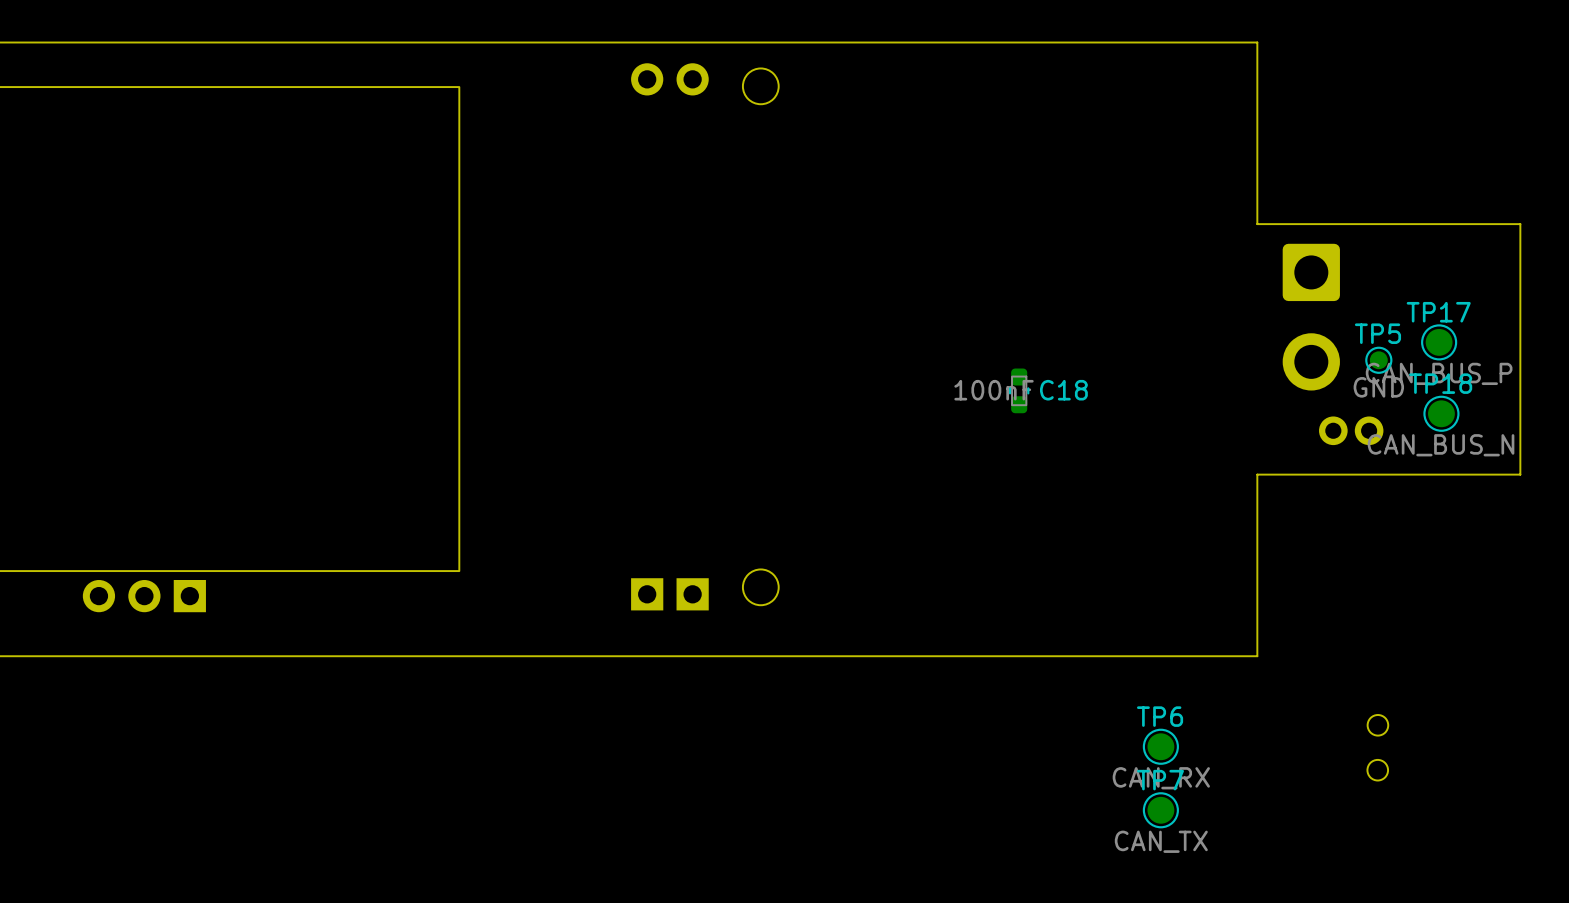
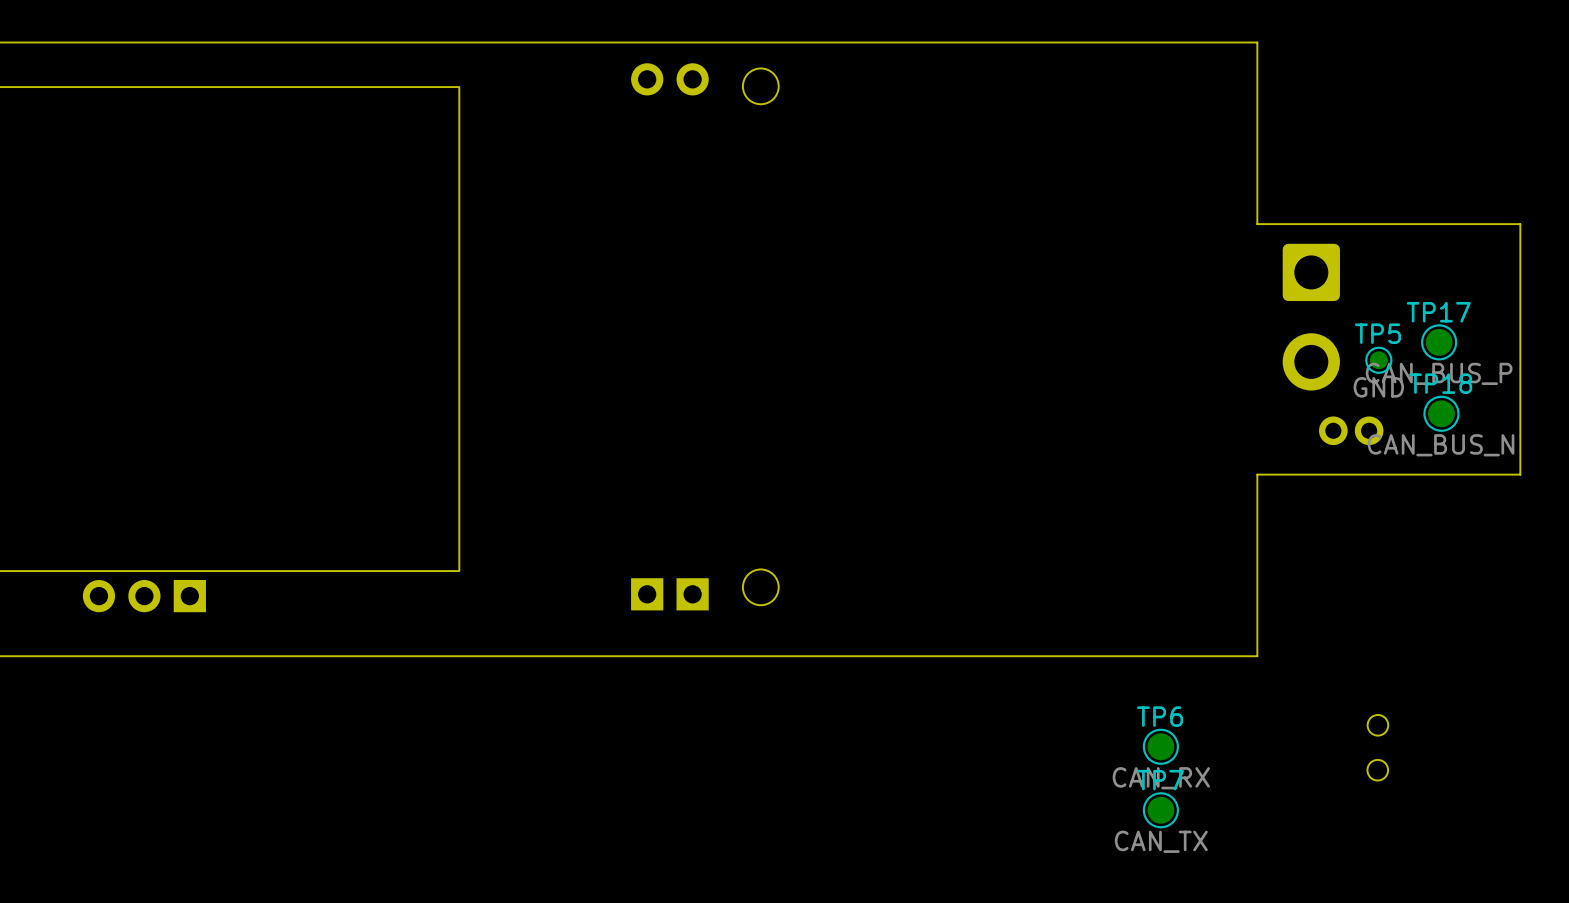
C18: 100nF (1019, 390) -> none

